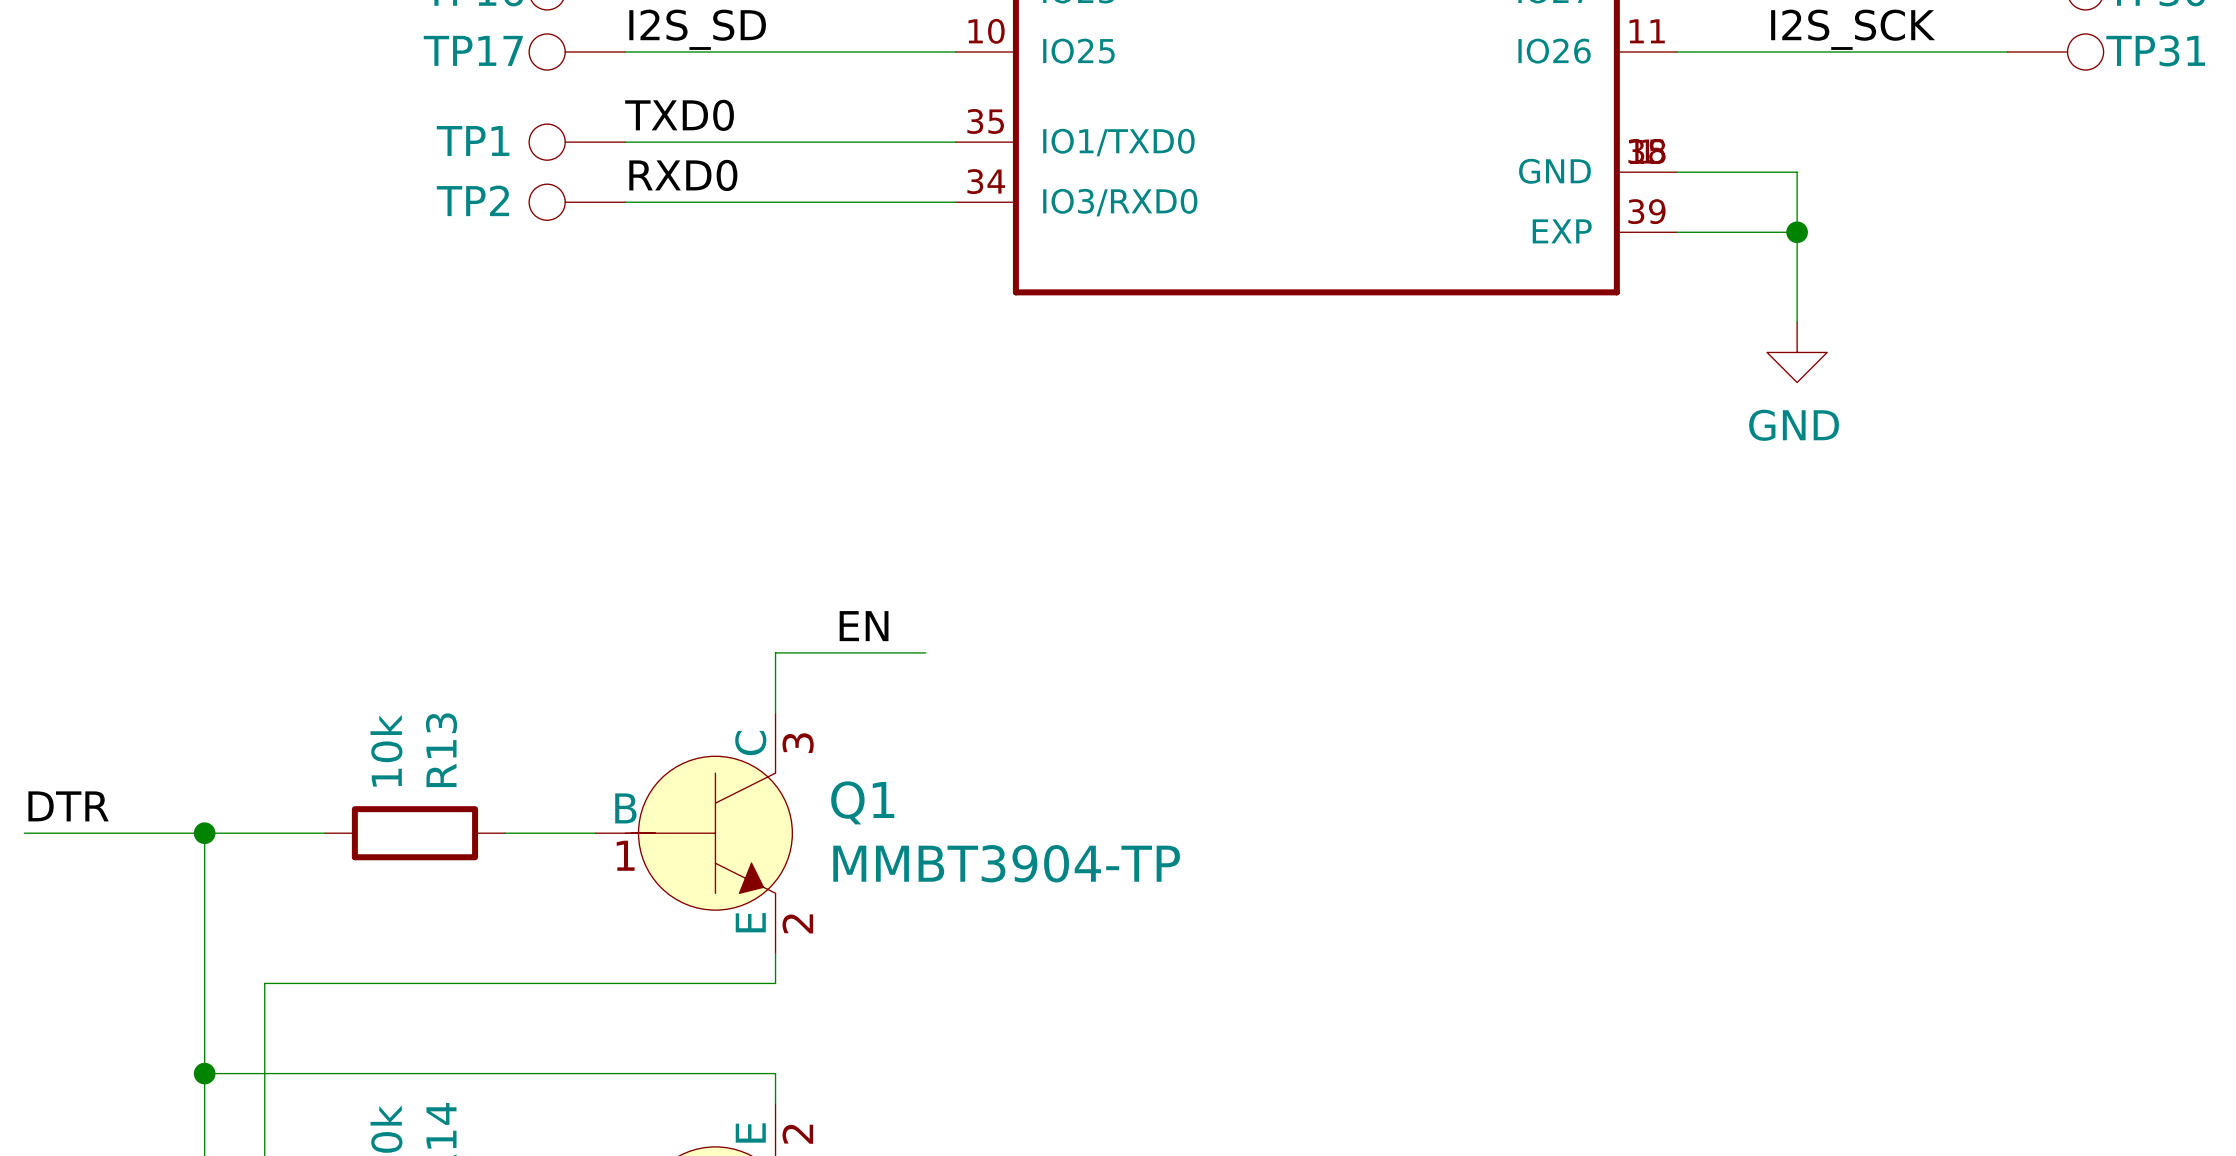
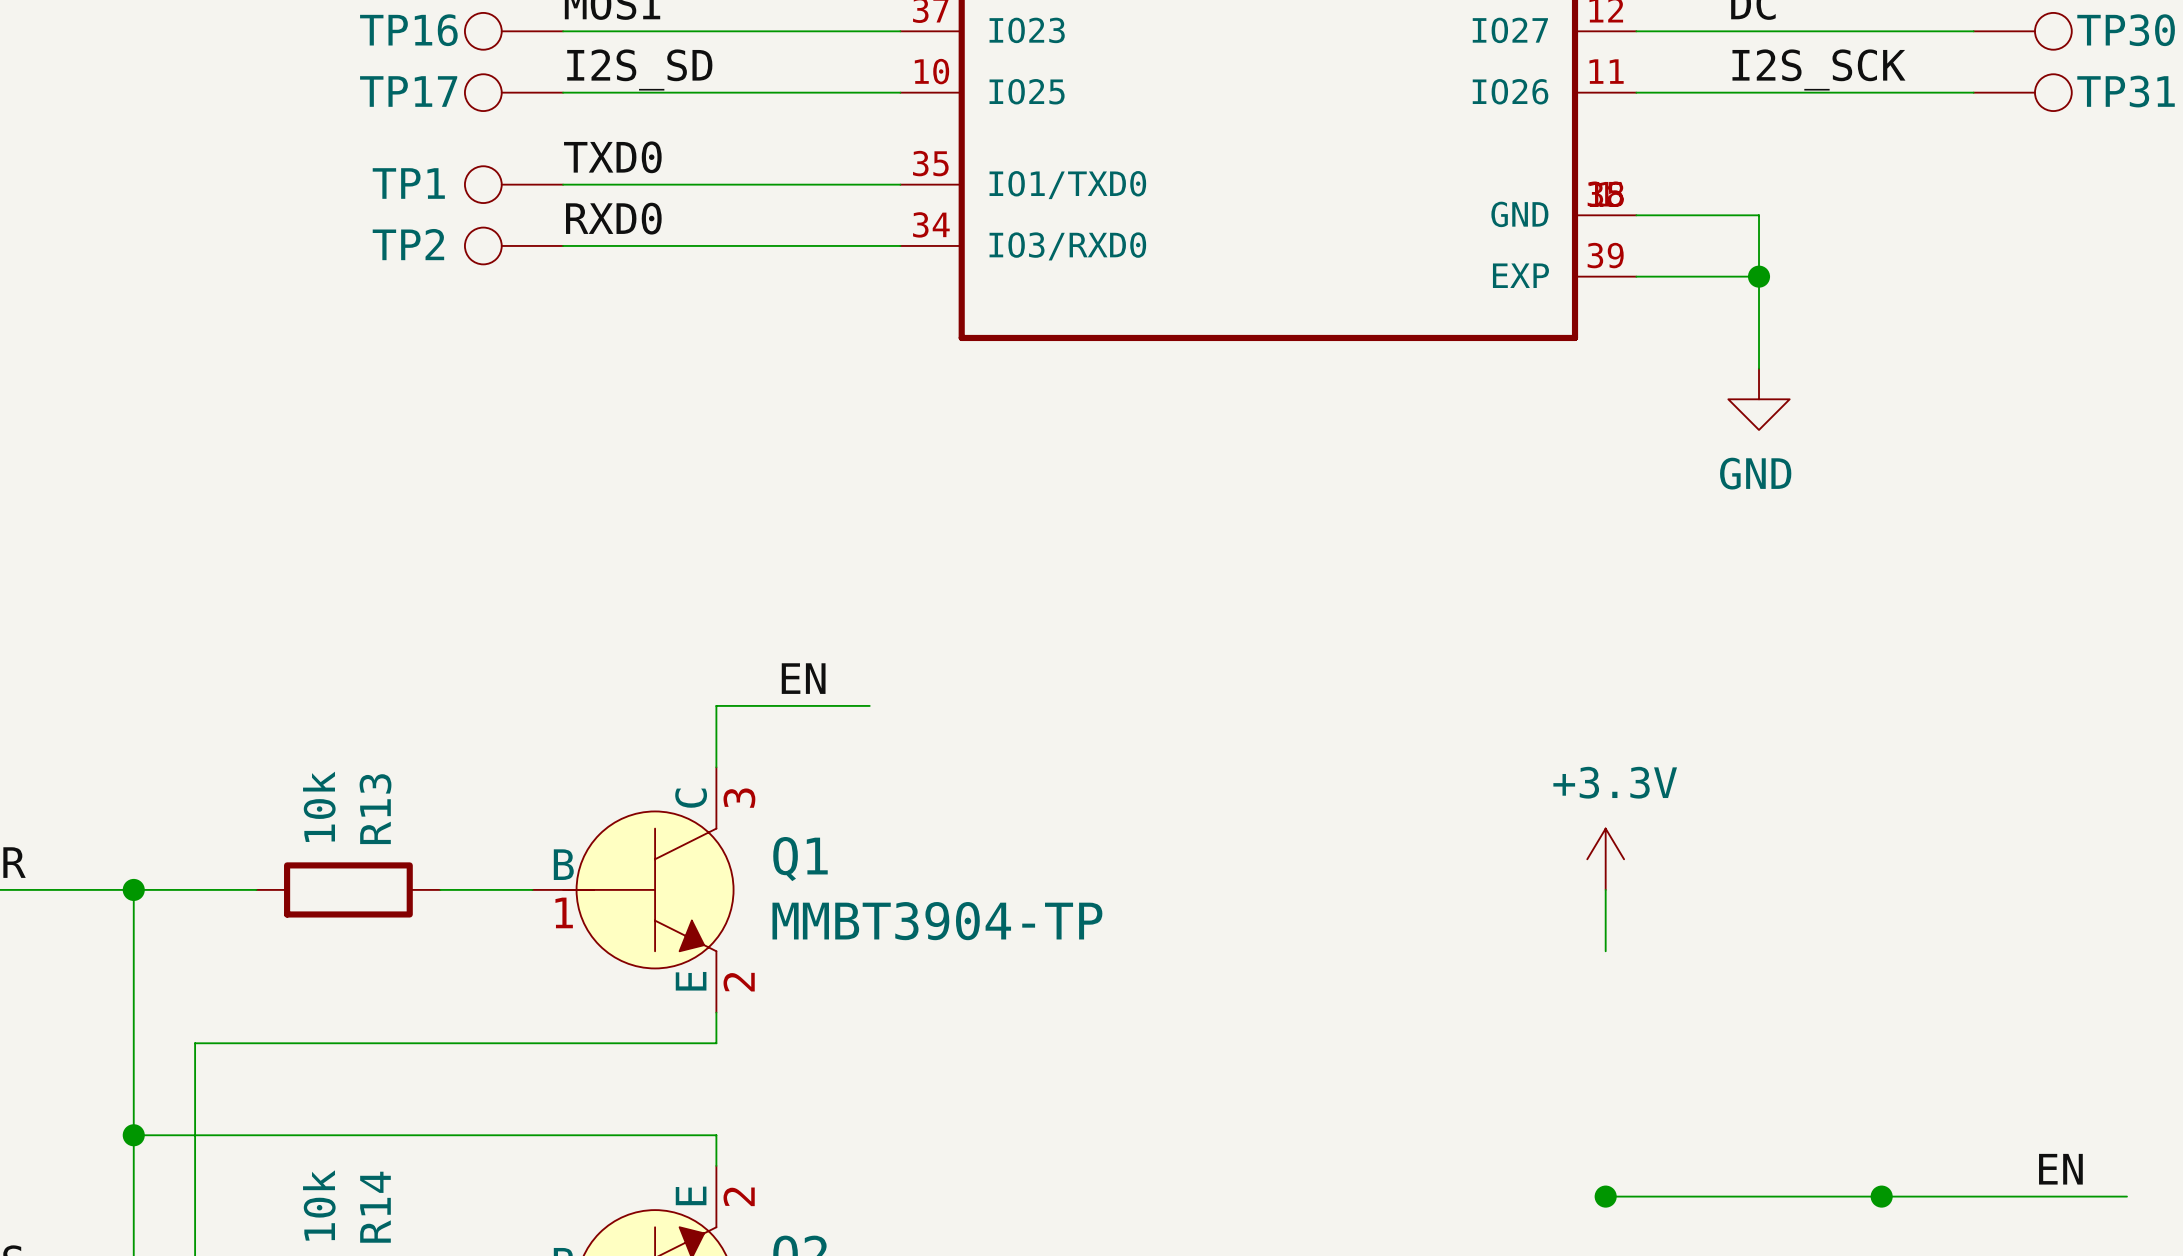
power symbol: none -> +3.3V (1605, 859)
wire: none -> (1605, 889) (1605, 951)
label: none -> EN (2060, 1169)
wire: none -> (1605, 1196) (2126, 1196)
junction: none -> (1605, 1196)
junction: none -> (1881, 1196)

